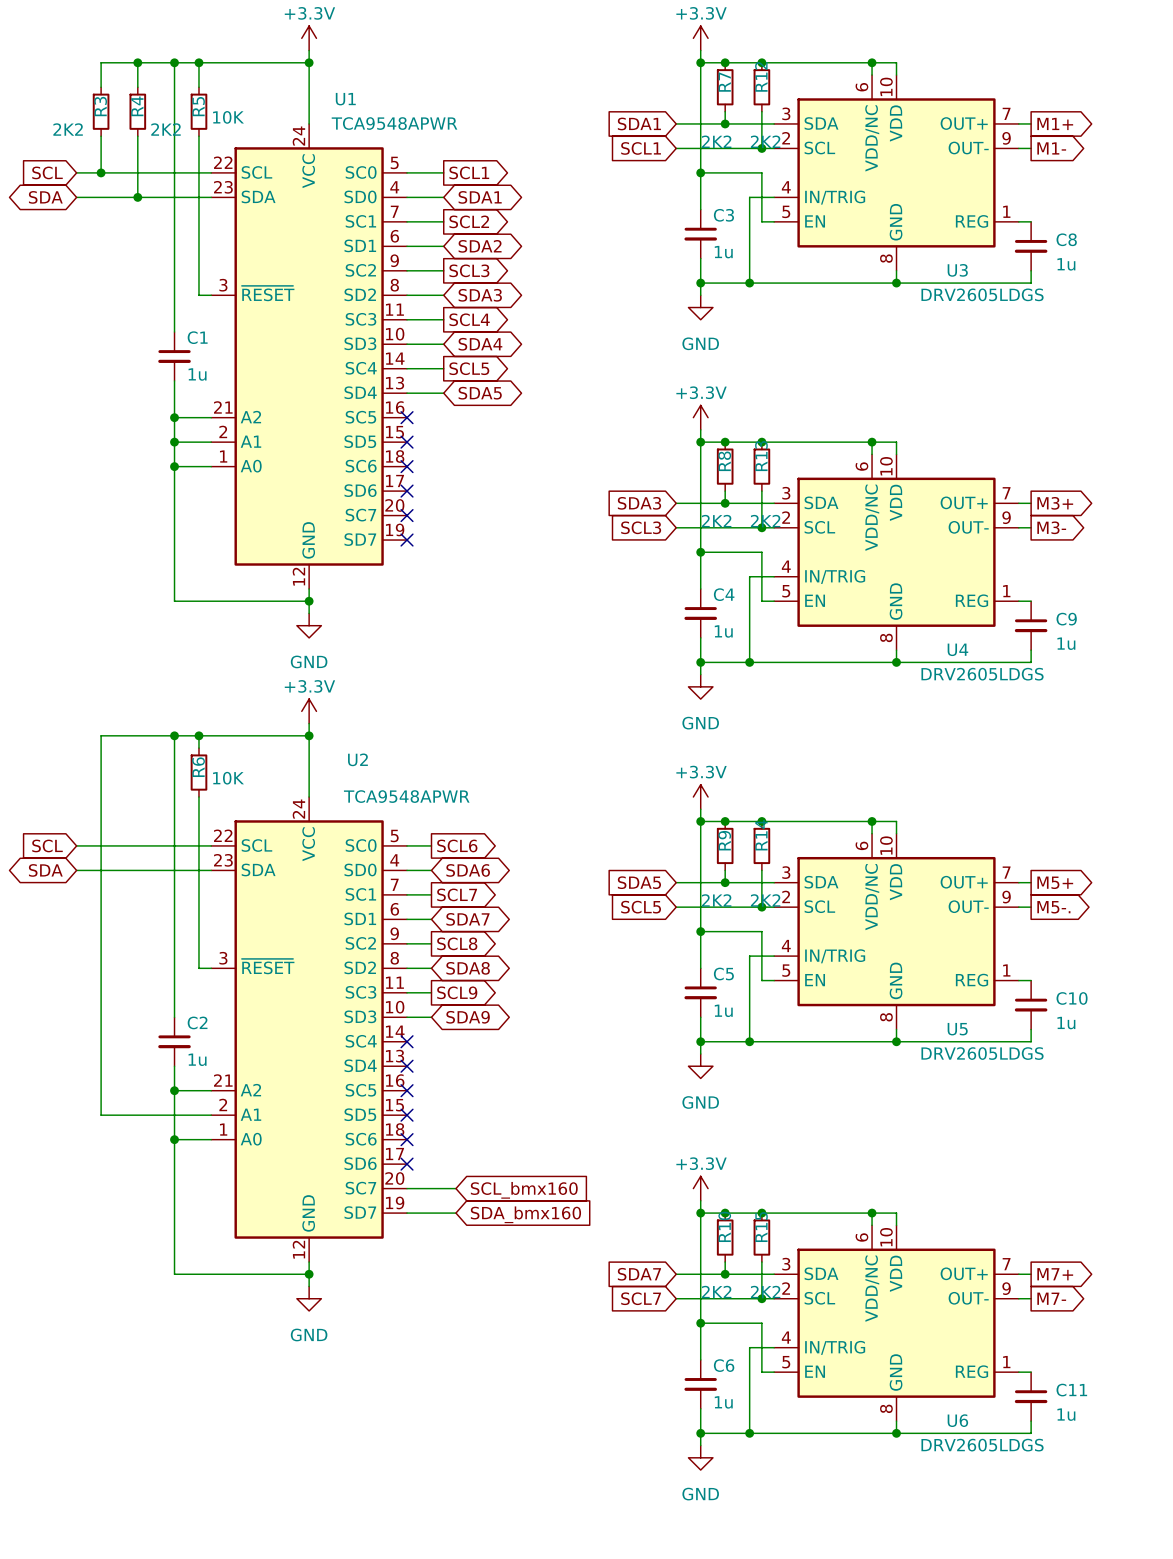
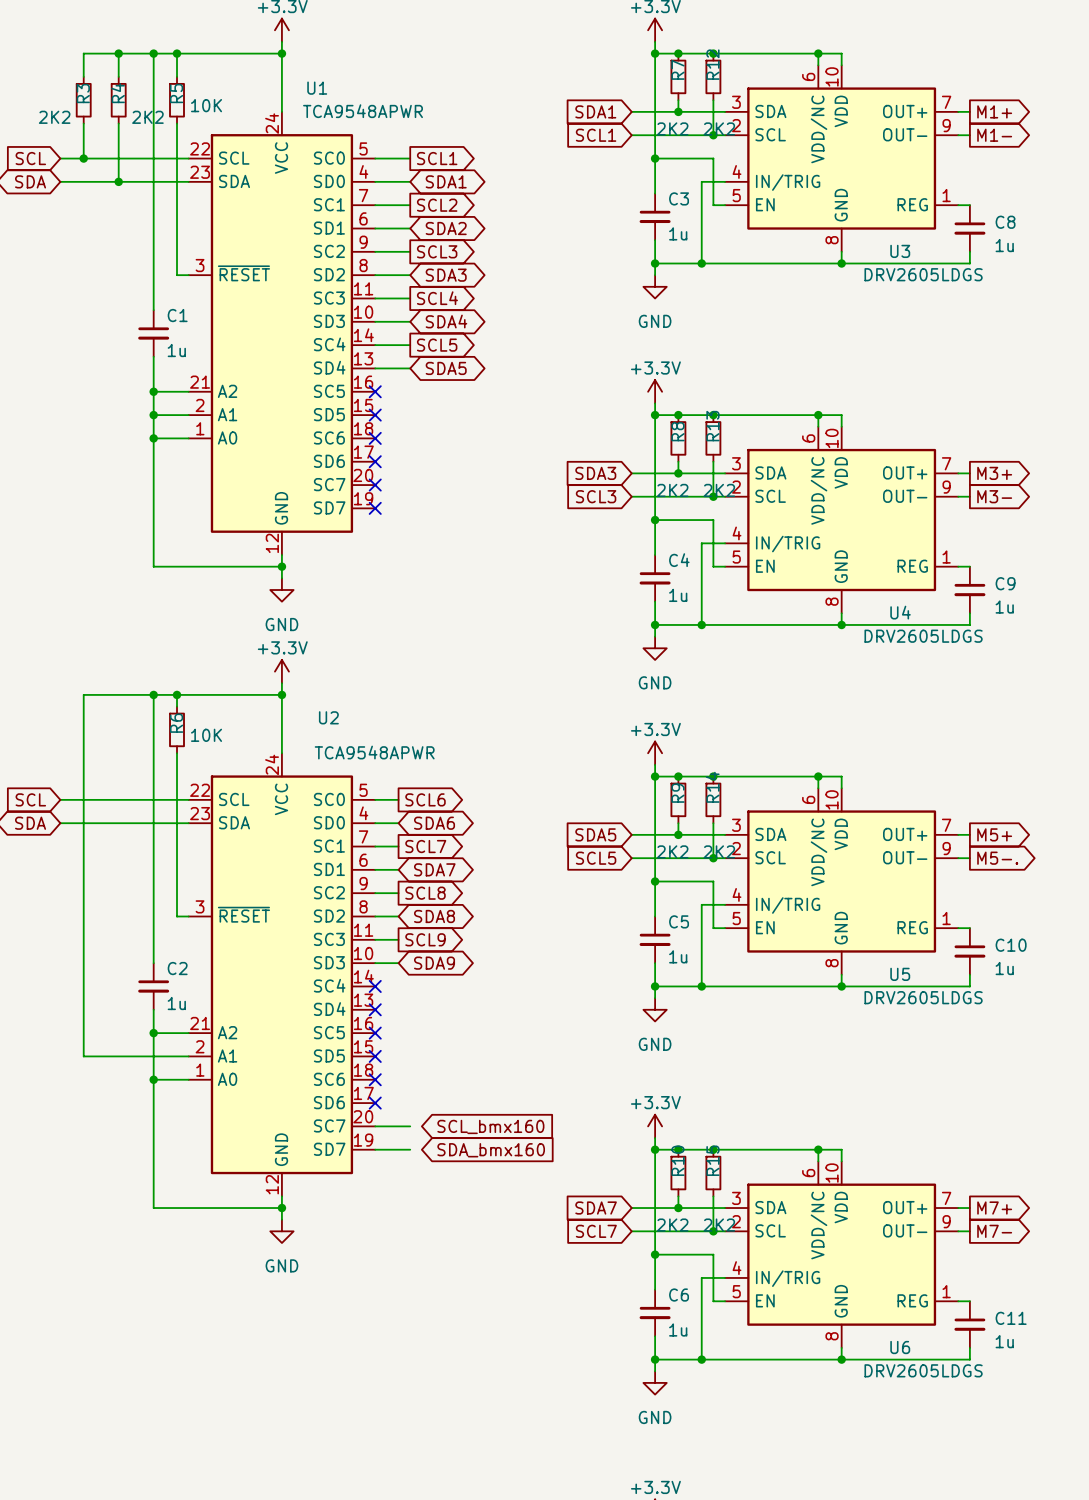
wire: (443, 1188) (455, 1188) -> none
wire: (443, 1213) (455, 1213) -> none

